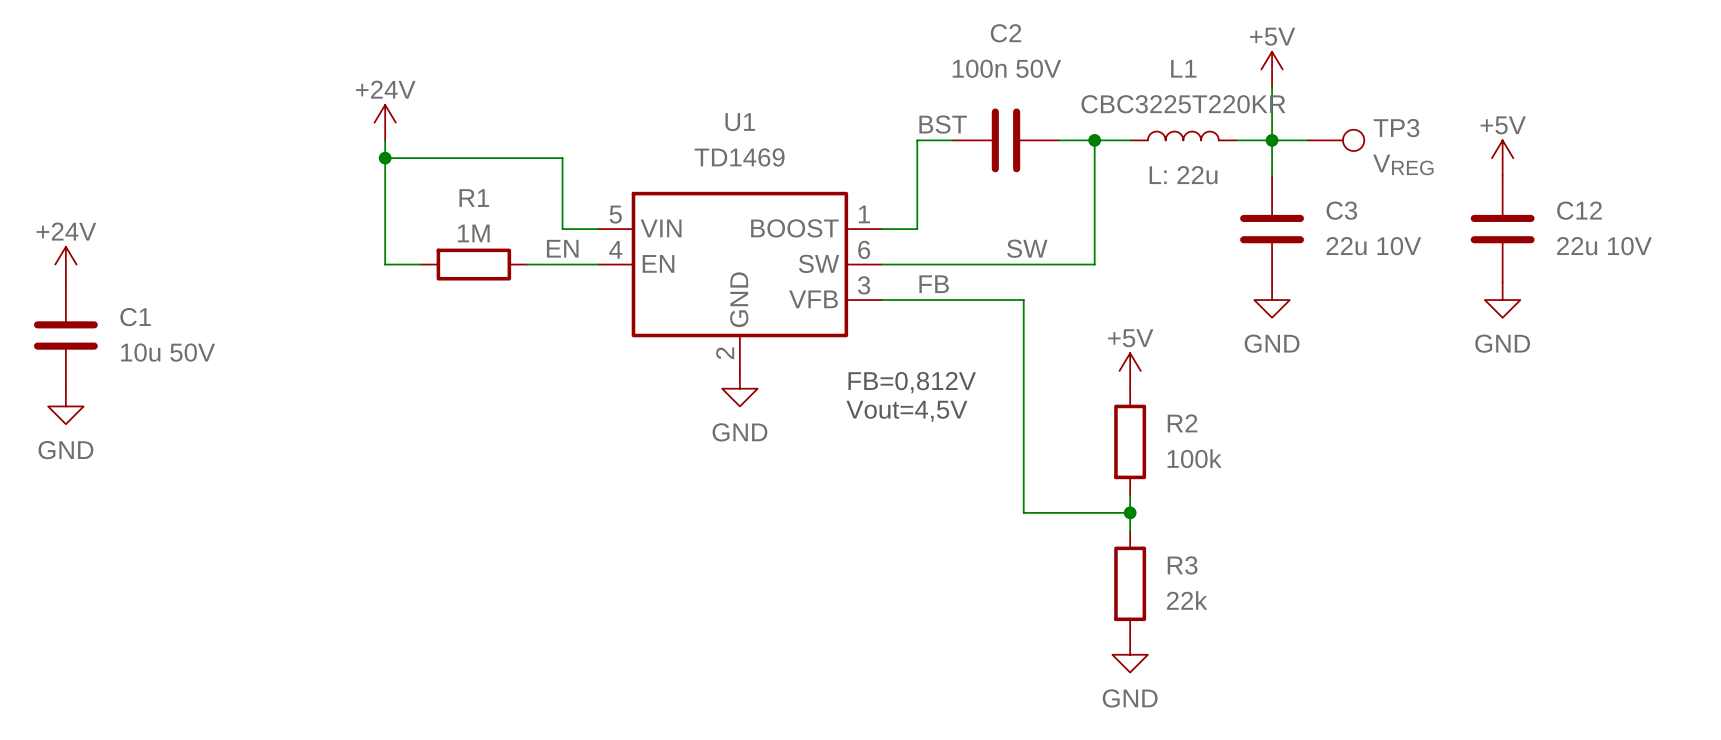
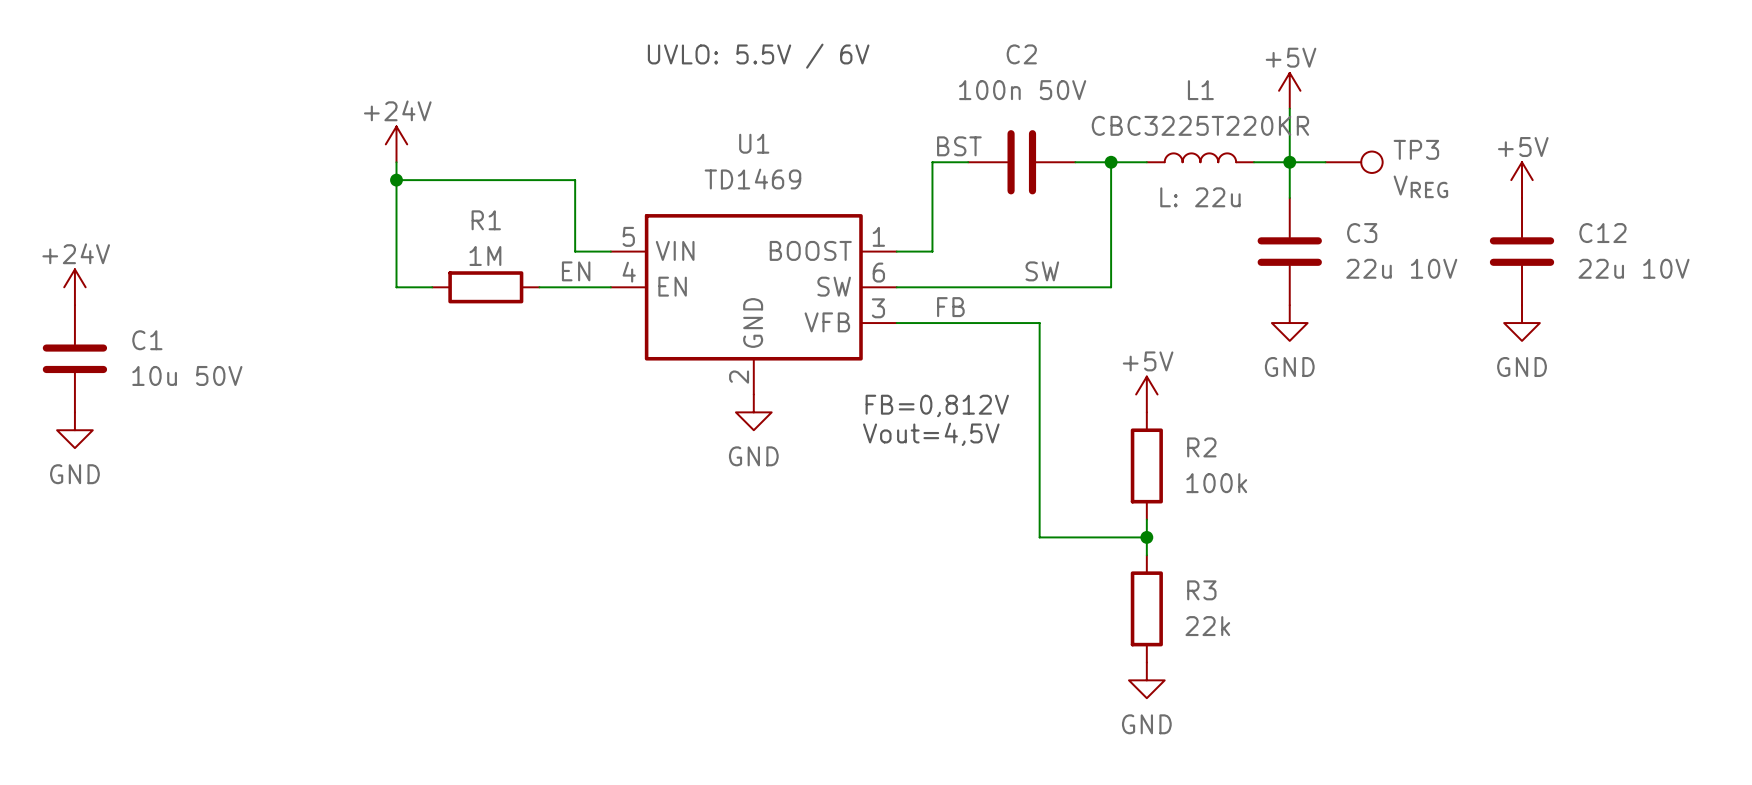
text: none -> UVLO: 5.5V / 6V (758, 56)

